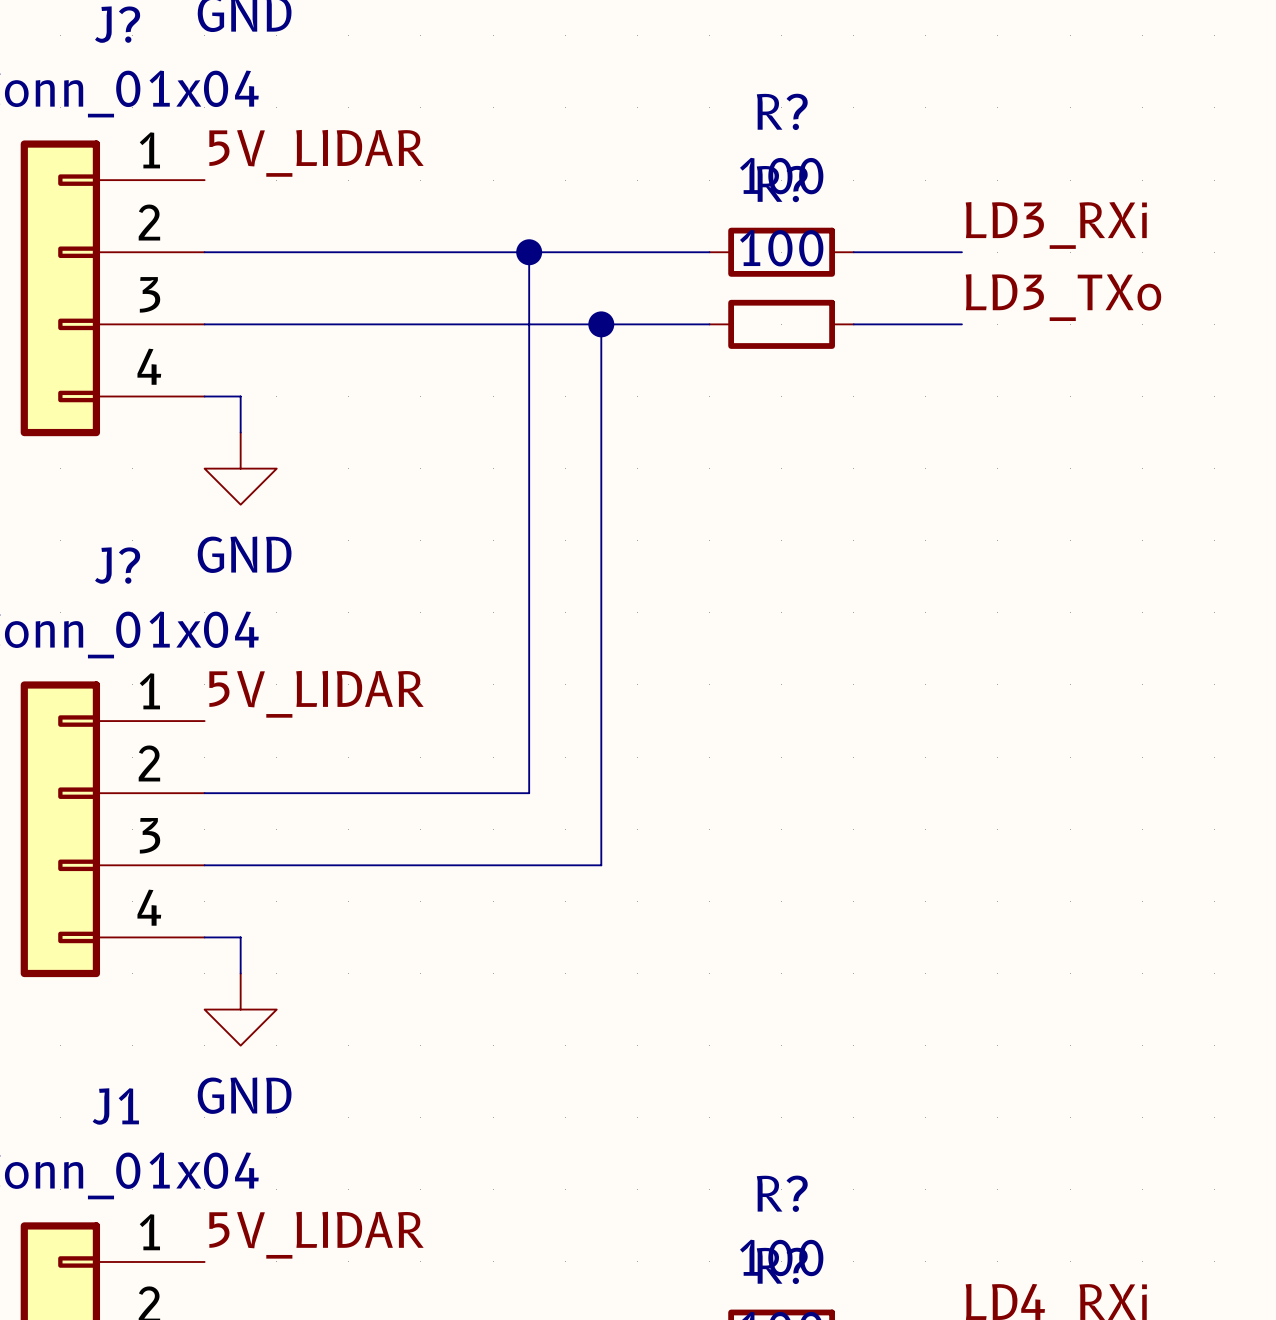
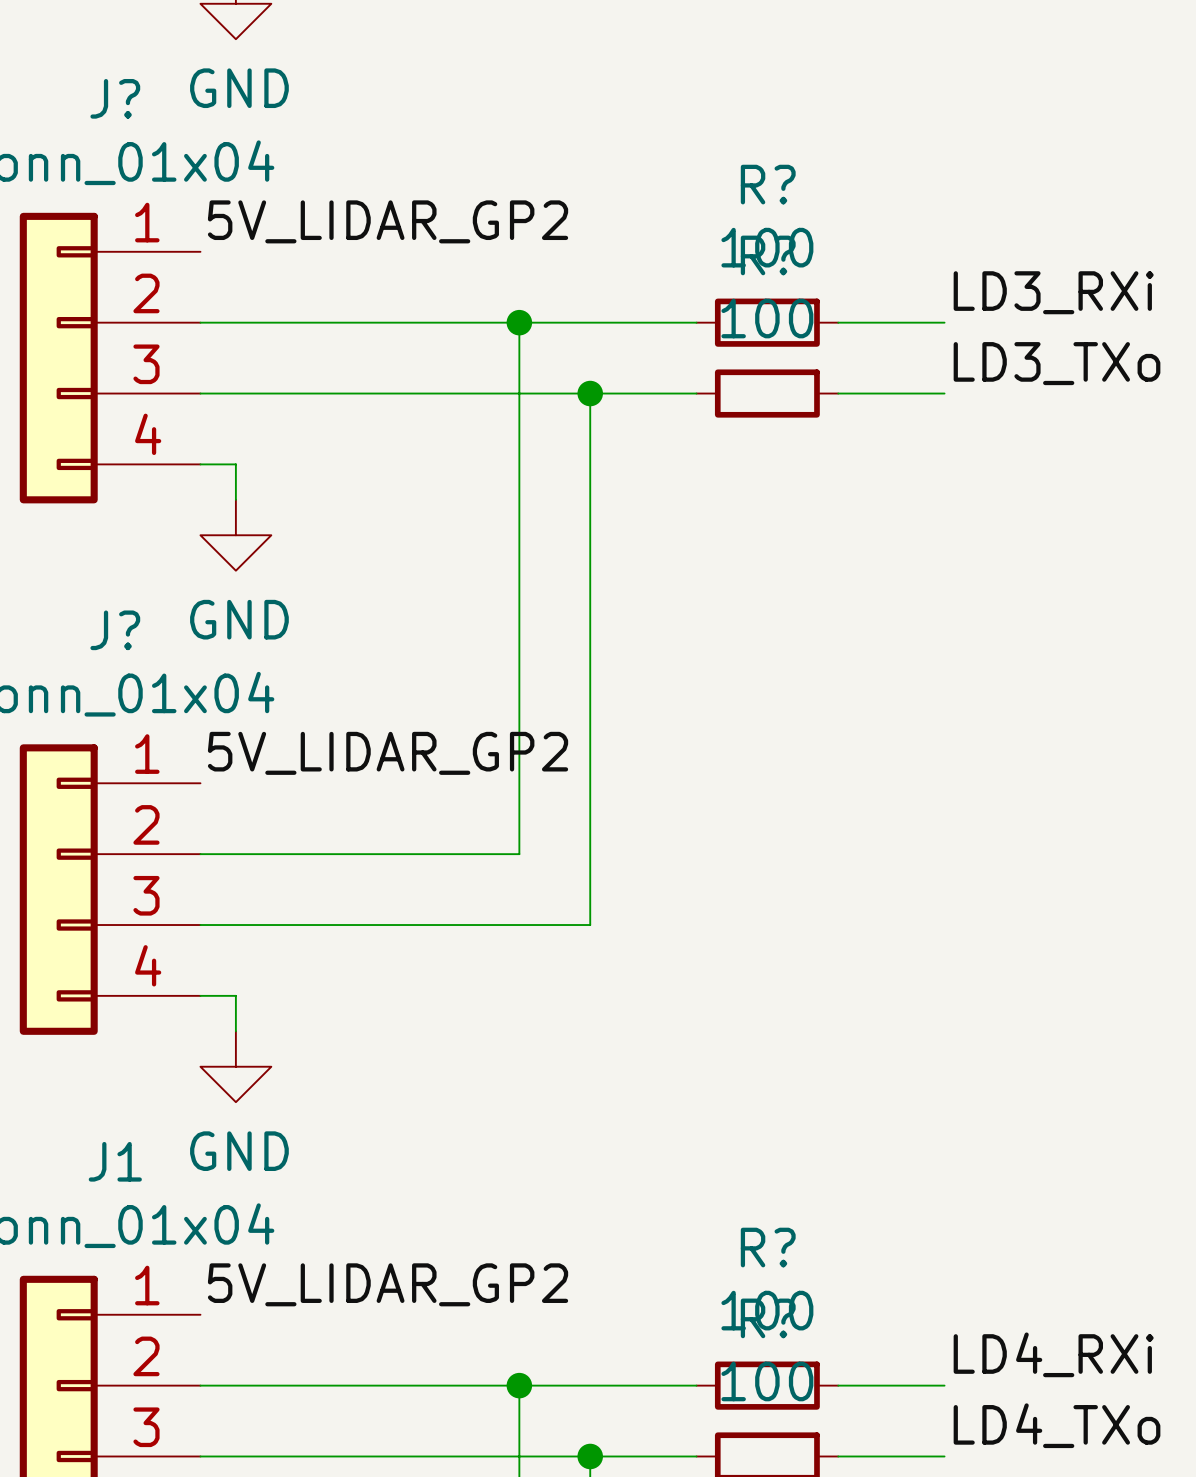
label: 5V_LIDAR (316, 153) -> 5V_LIDAR_GP2 (388, 221)
label: 5V_LIDAR (316, 694) -> 5V_LIDAR_GP2 (388, 753)
label: 5V_LIDAR (316, 1235) -> 5V_LIDAR_GP2 (388, 1284)

